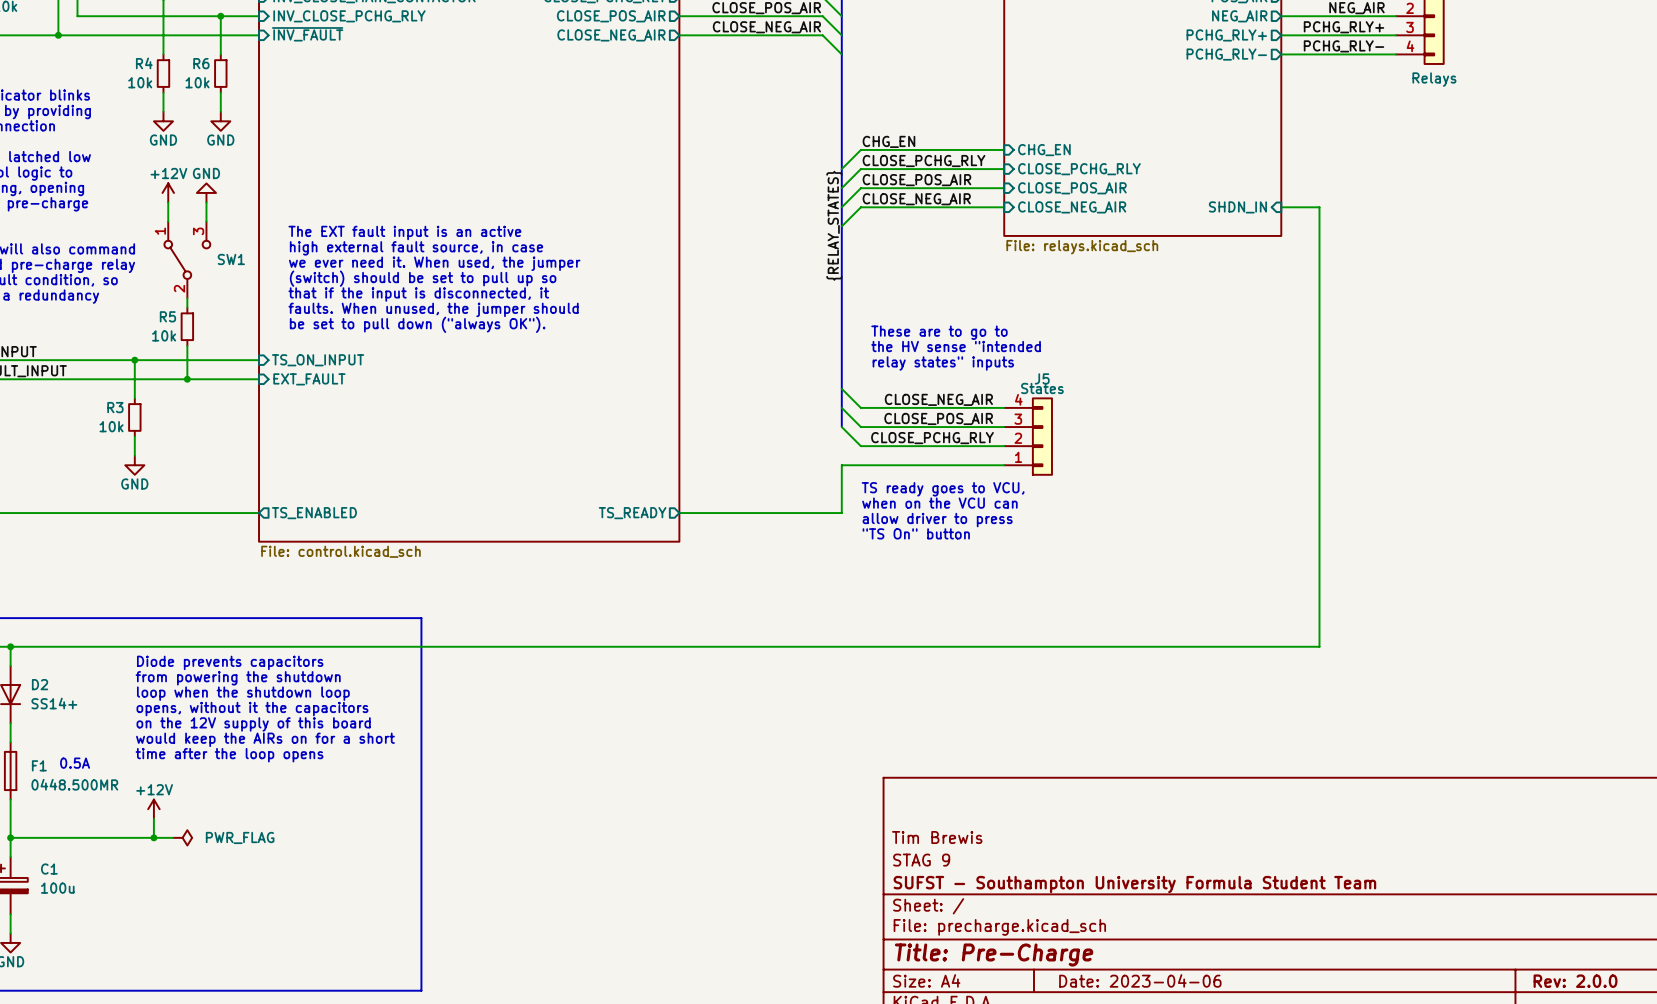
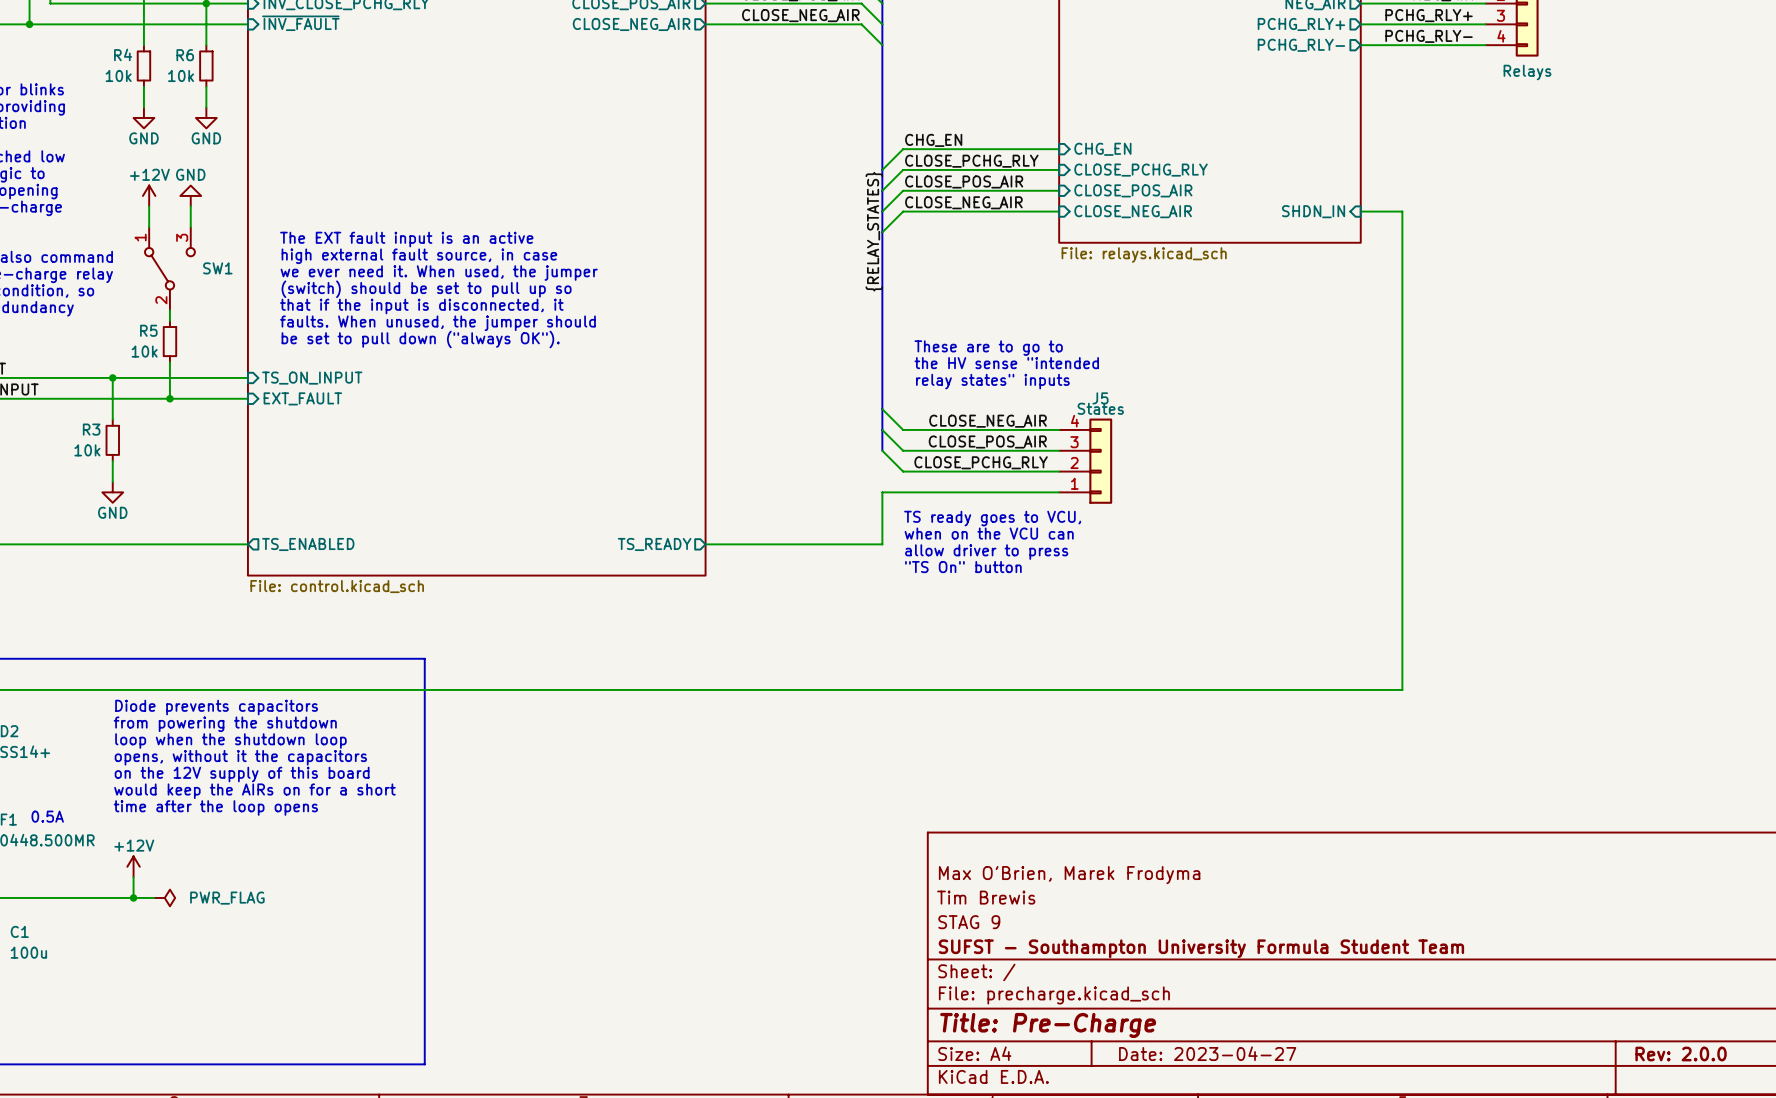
title block: none -> Max O'Brien, Marek Frodyma (1069, 875)
title block: Date: 2023-04-06 (1140, 980) -> Date: 2023-04-27 (1207, 1053)

